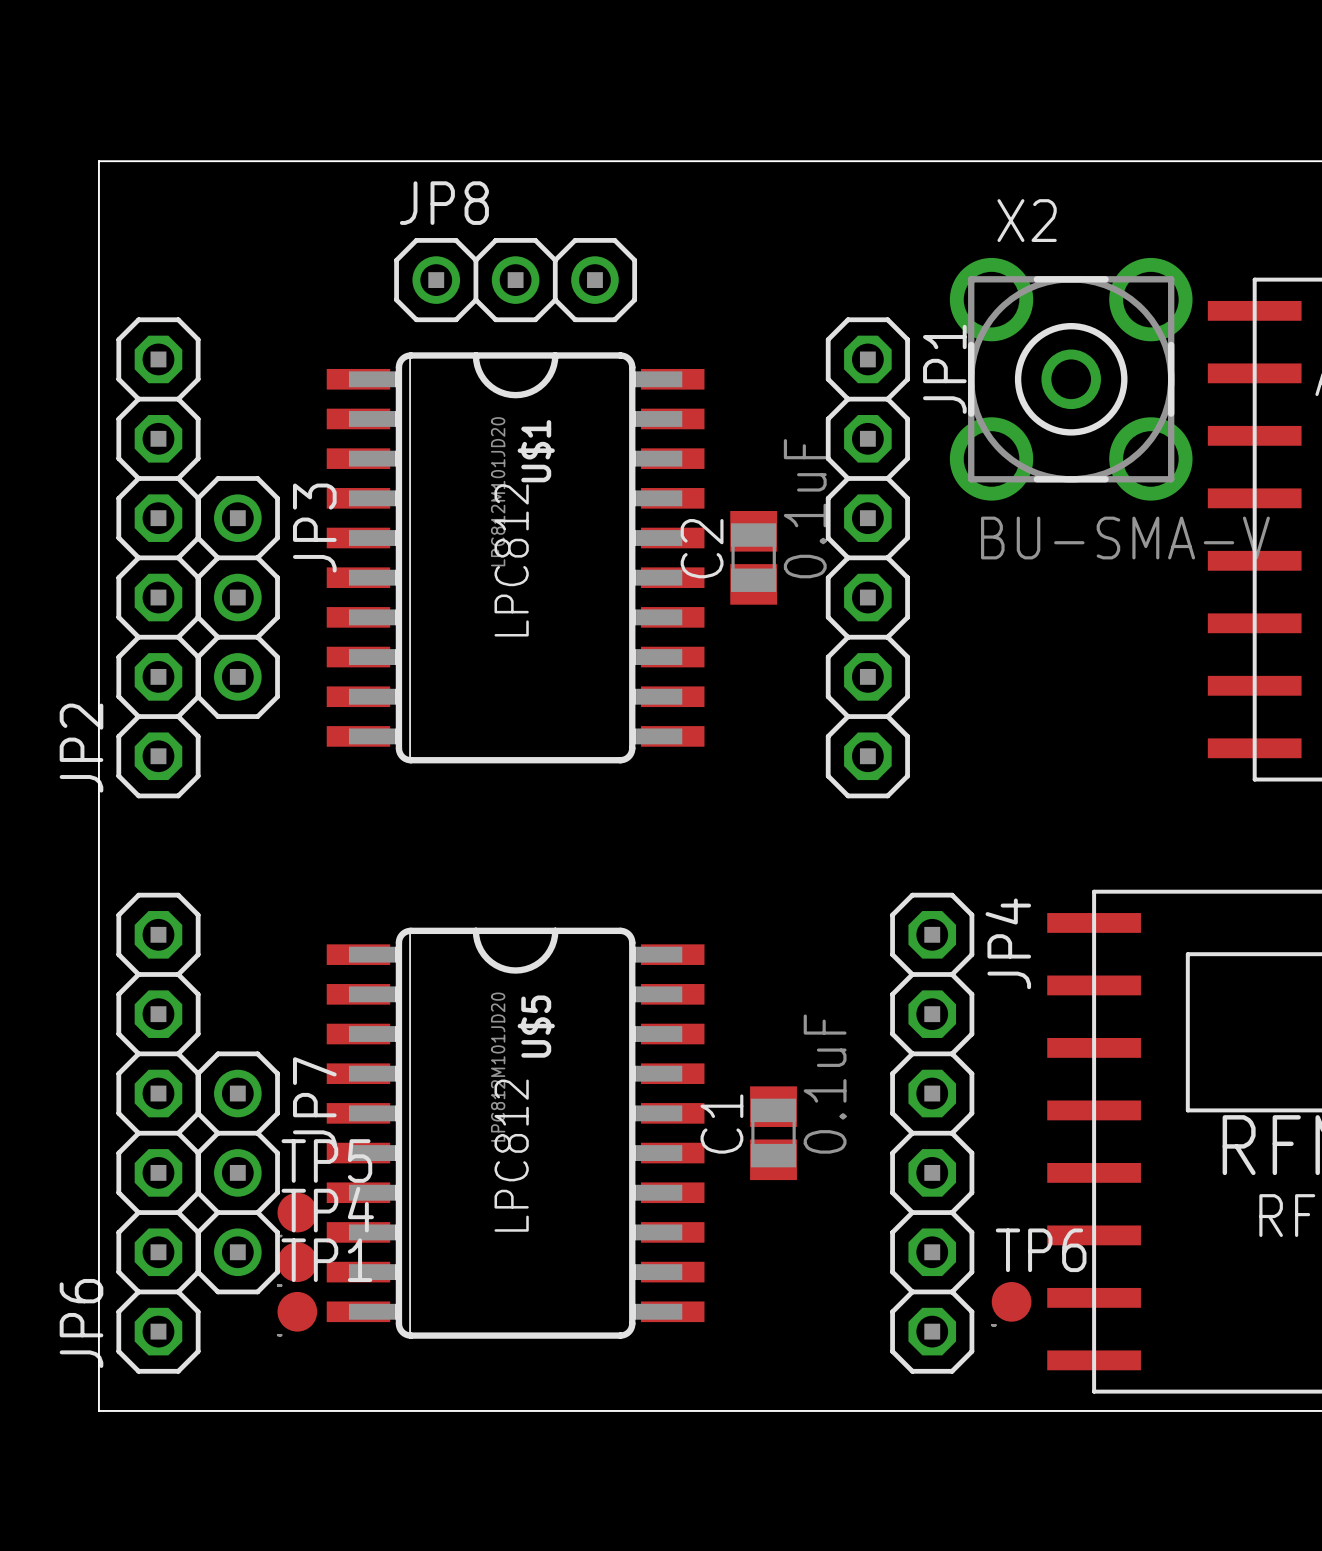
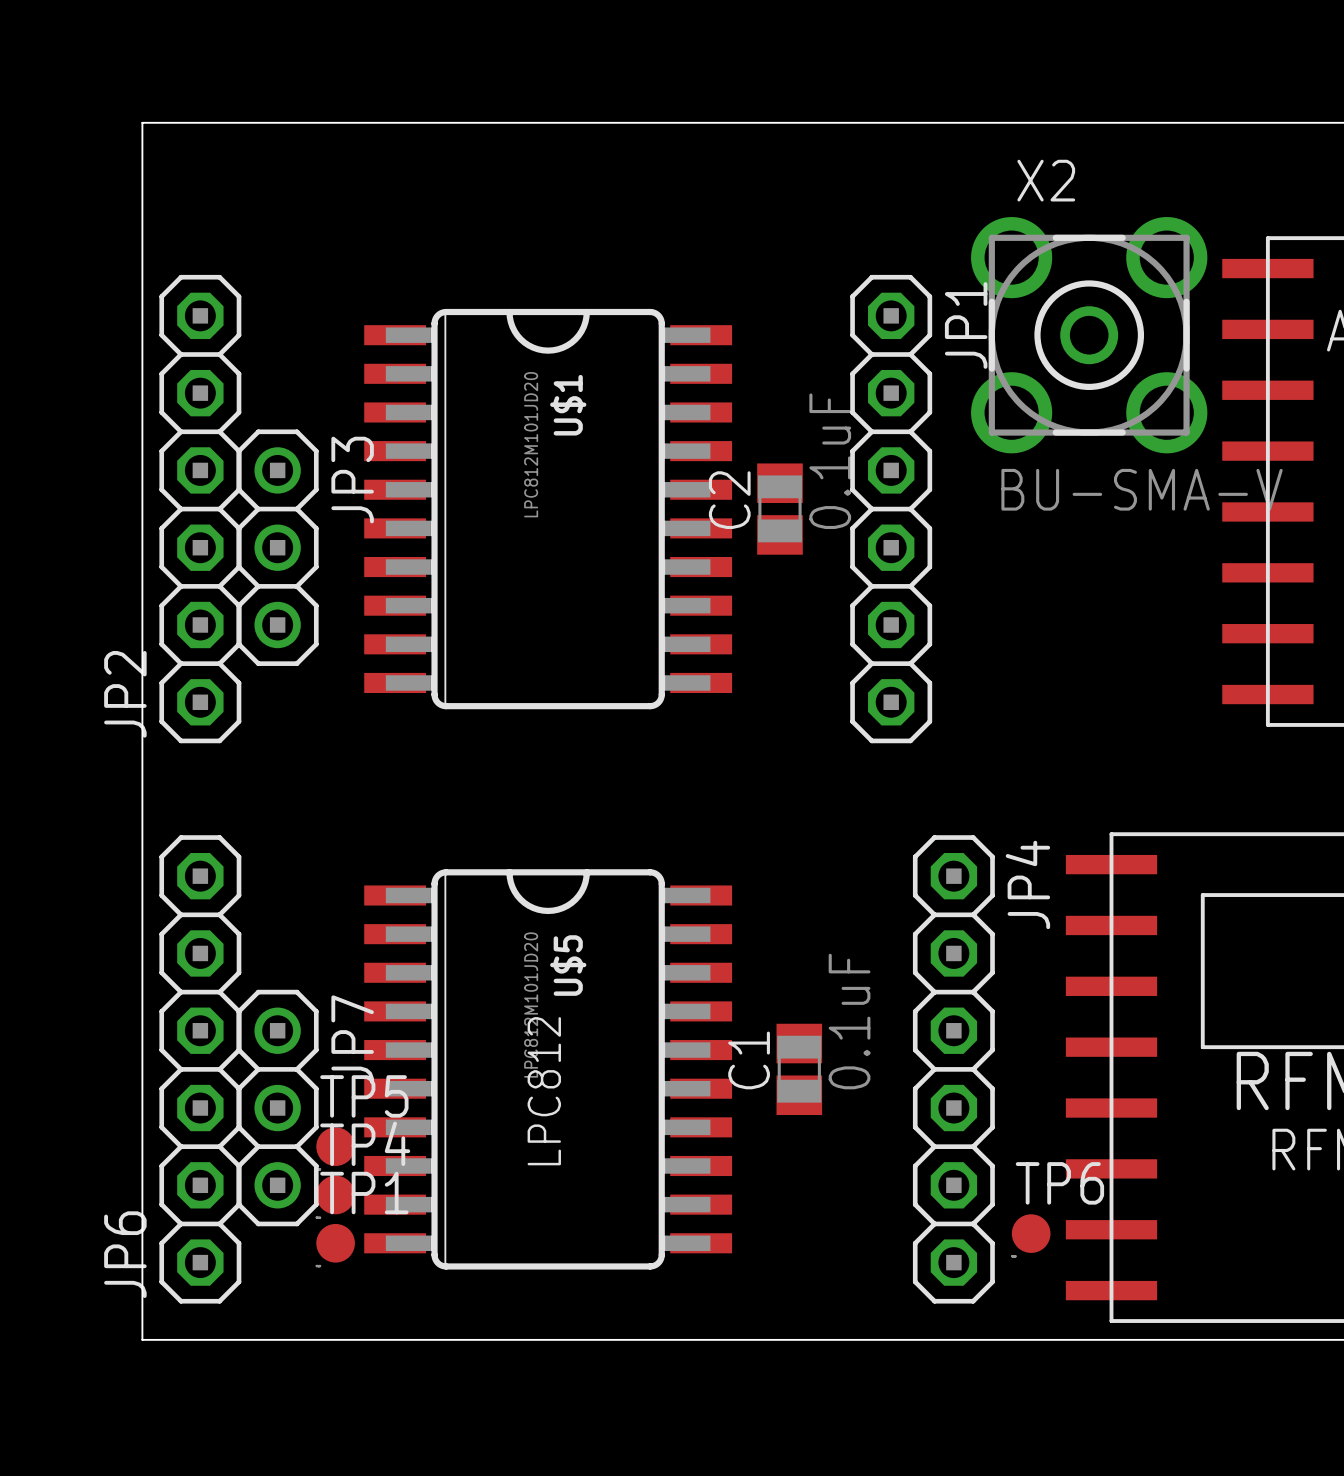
JP8: (515, 280) -> none
text: LPC812 (511, 560) -> none

